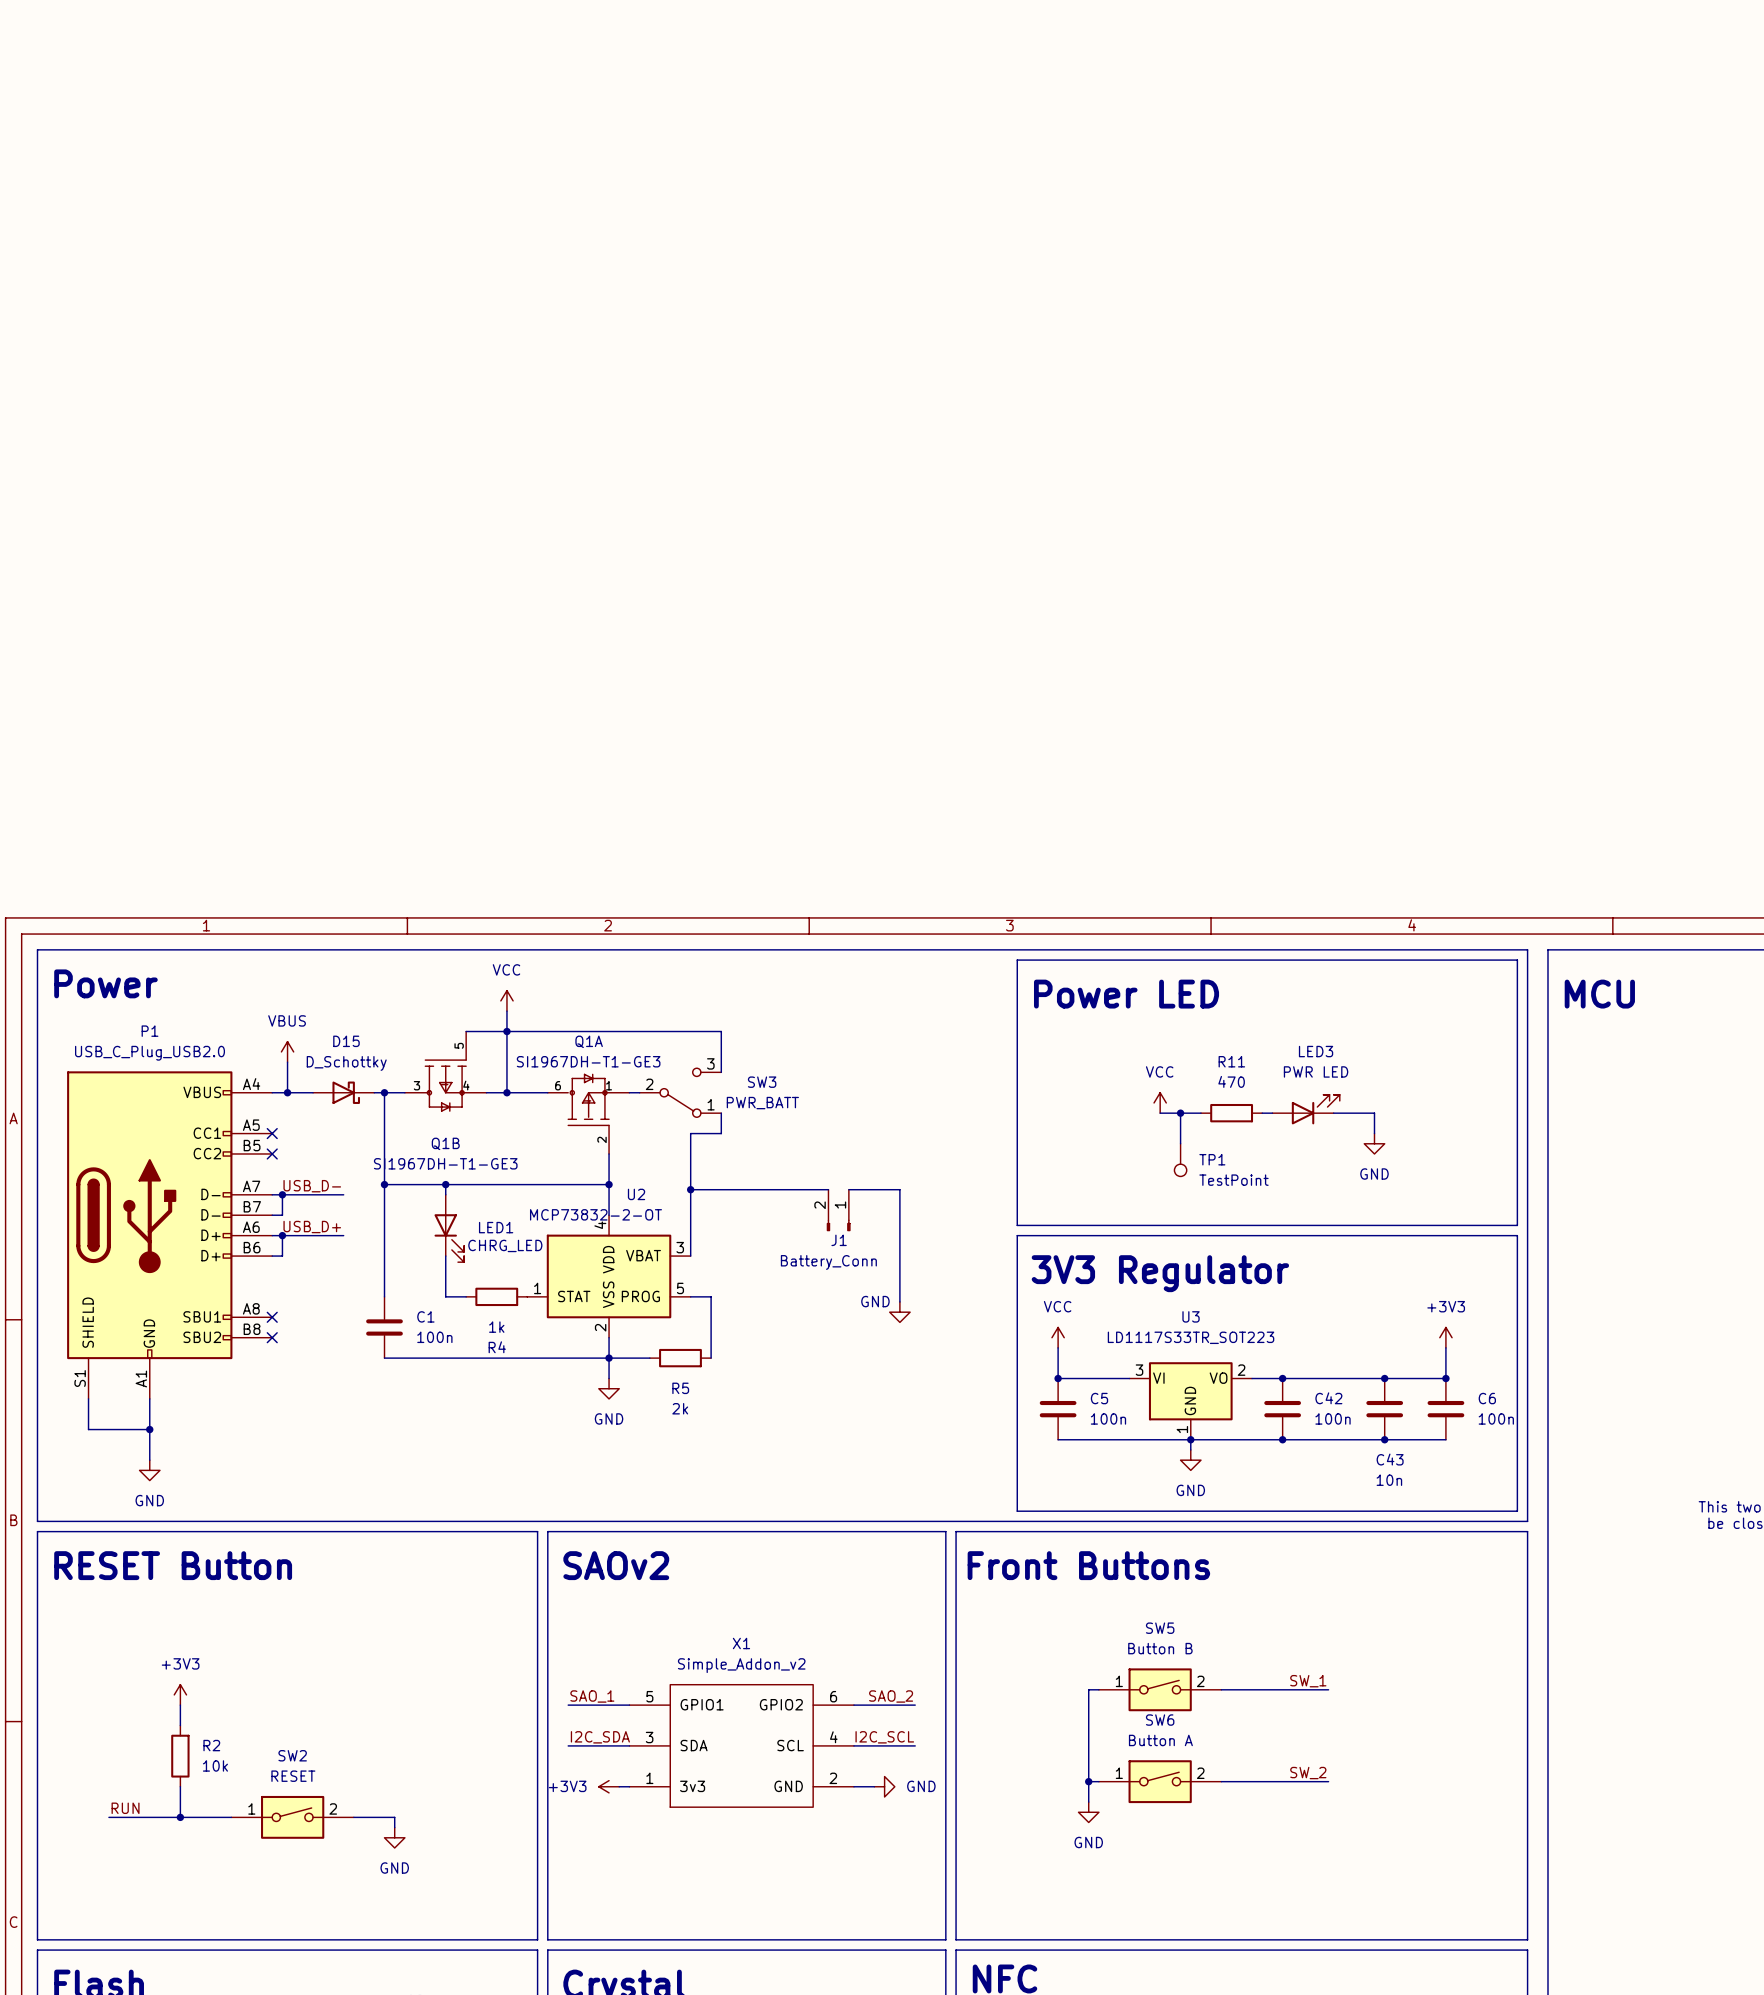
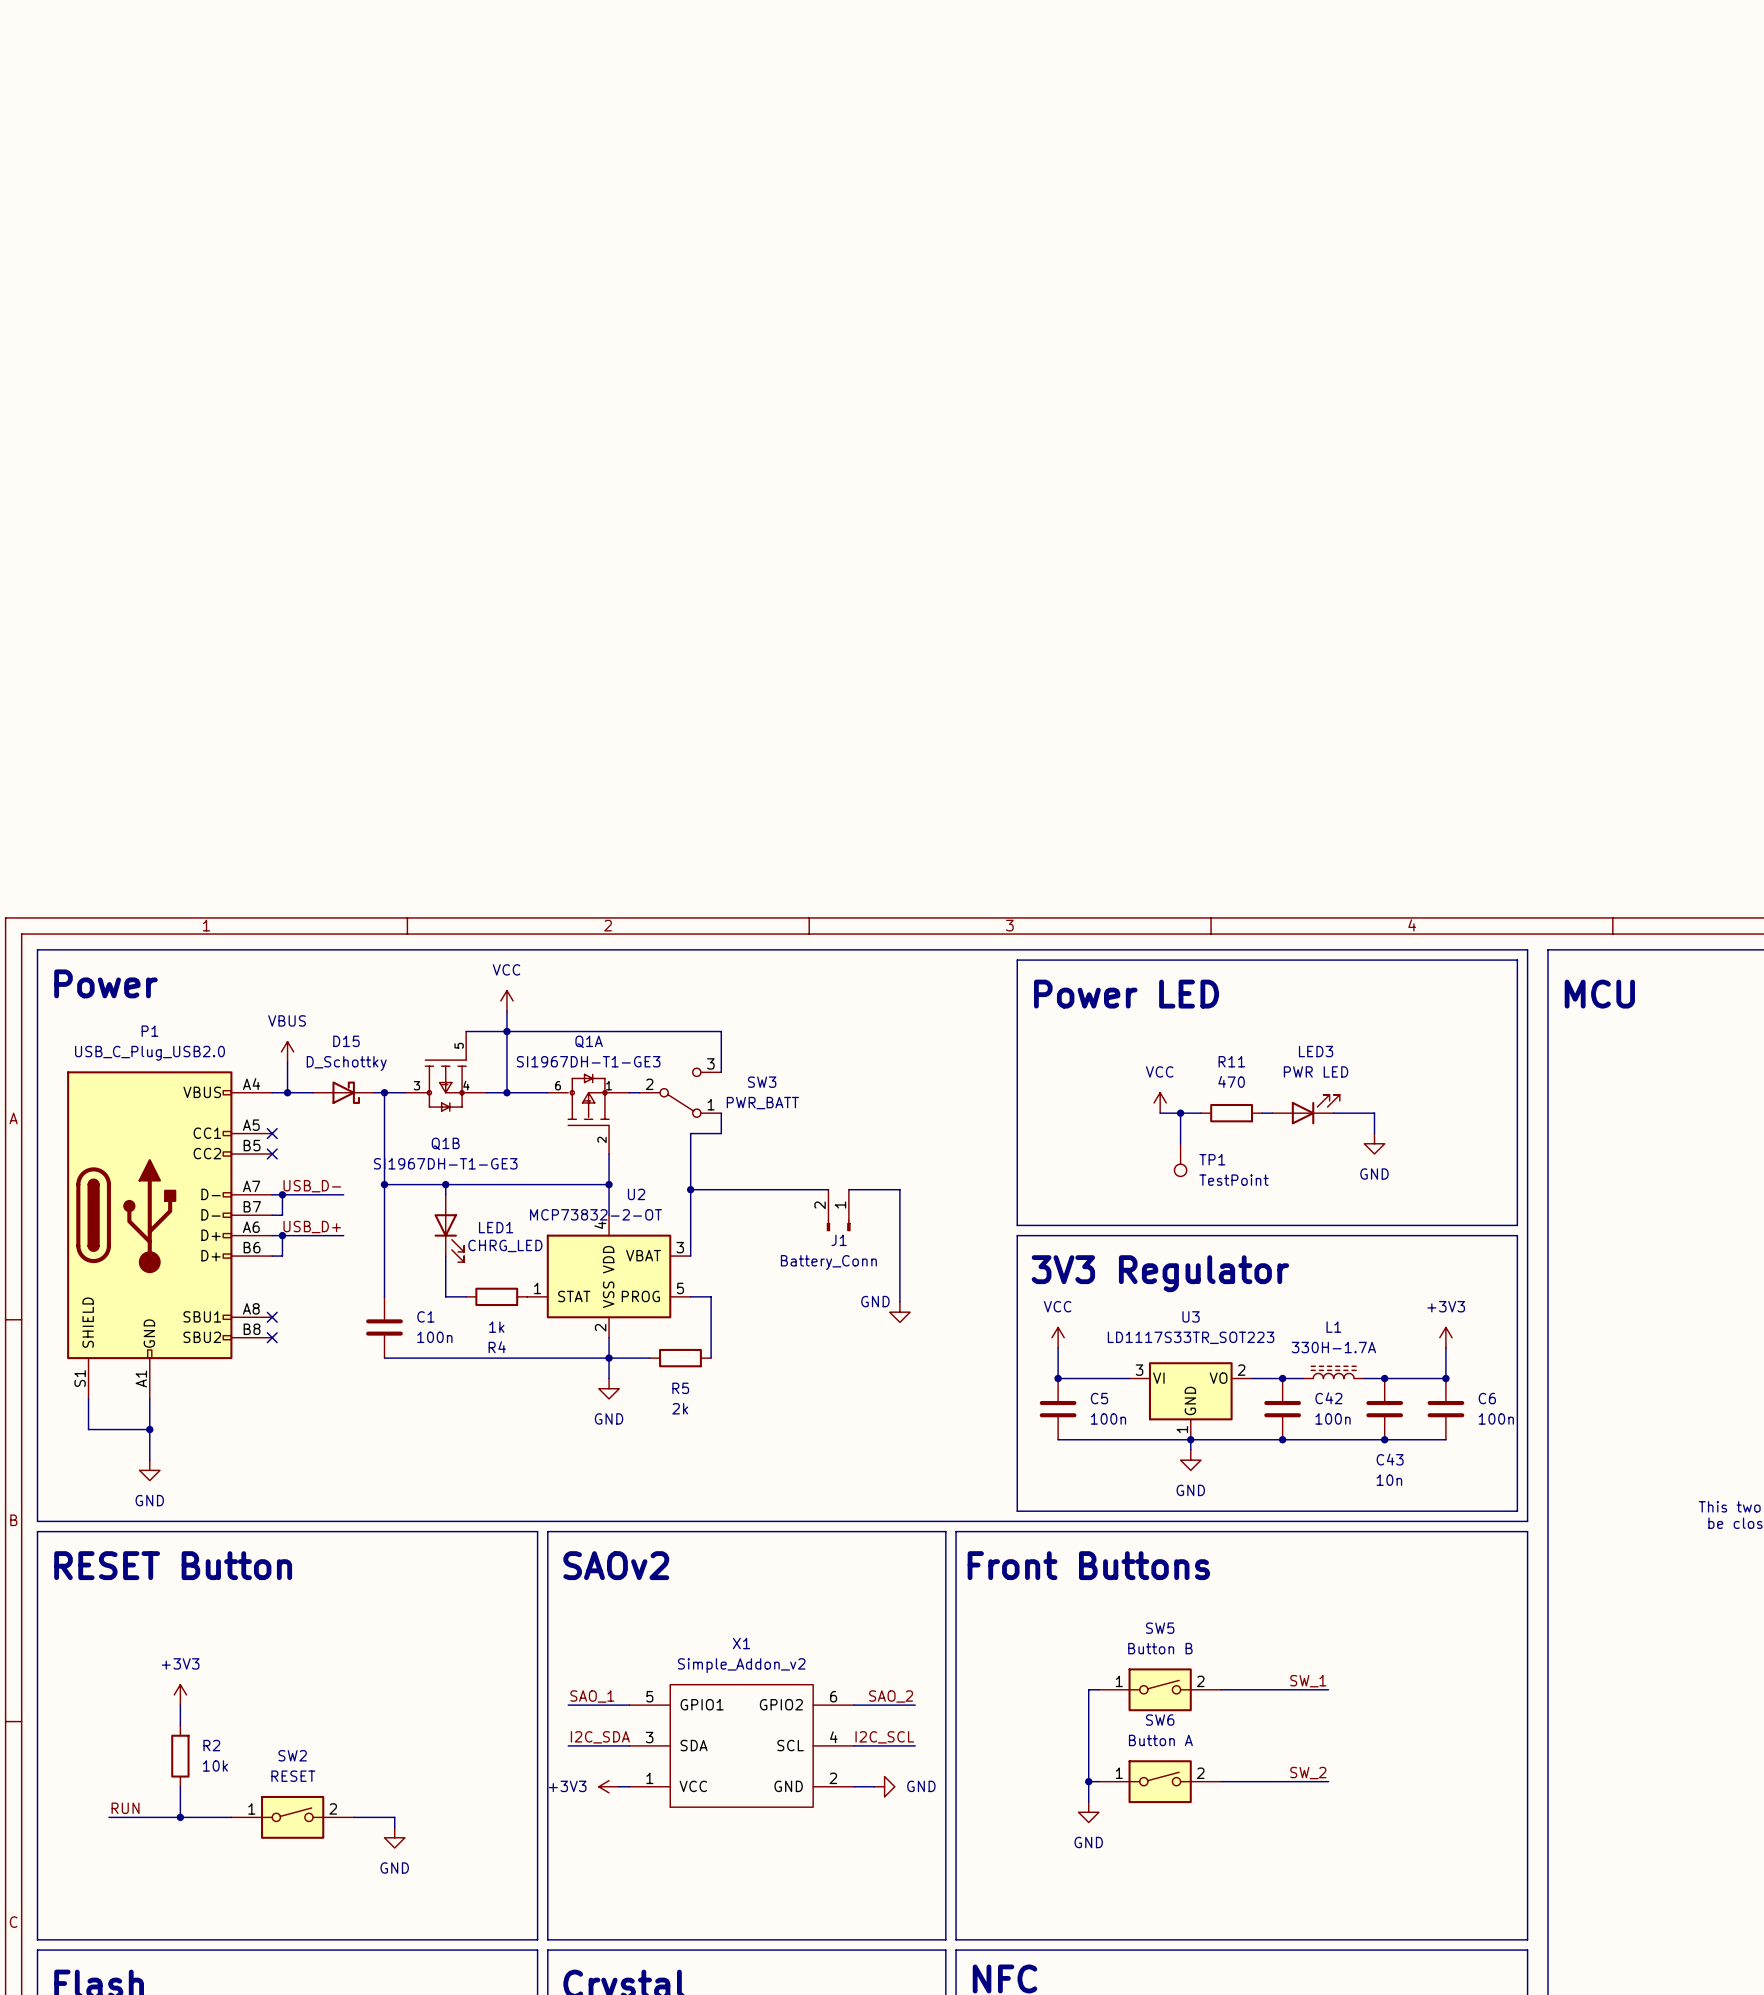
L1: none -> 330H-1.7A (1333, 1372)
wire: (1303, 1378) (1364, 1378) -> none
X1 pin name: 3v3 (692, 1786) -> VCC (693, 1786)

